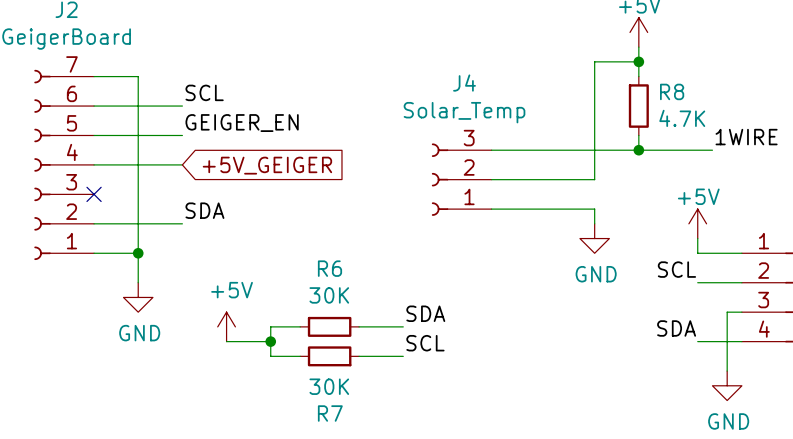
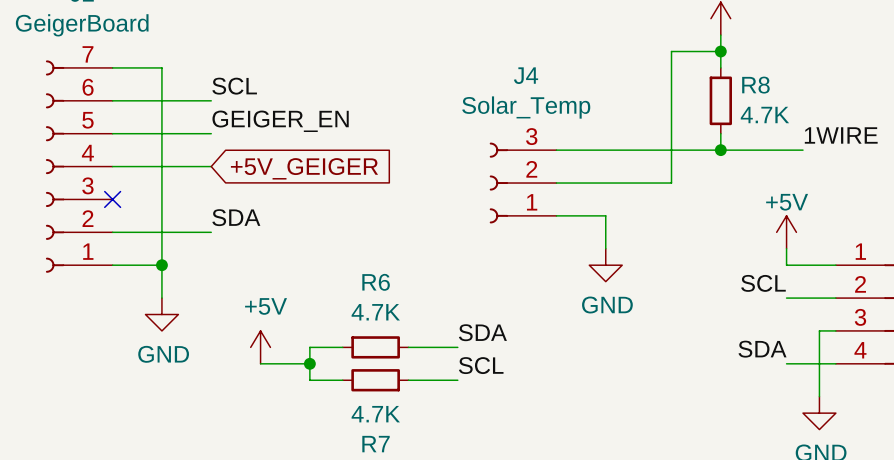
wire: (535, 209) (594, 209) (594, 223) -> (605, 215) (605, 248)
power symbol position: GND (594, 238) -> GND (605, 265)
R6 value: 30K (329, 295) -> 4.7K (375, 312)
R7 value: 30K (329, 386) -> 4.7K (375, 414)

